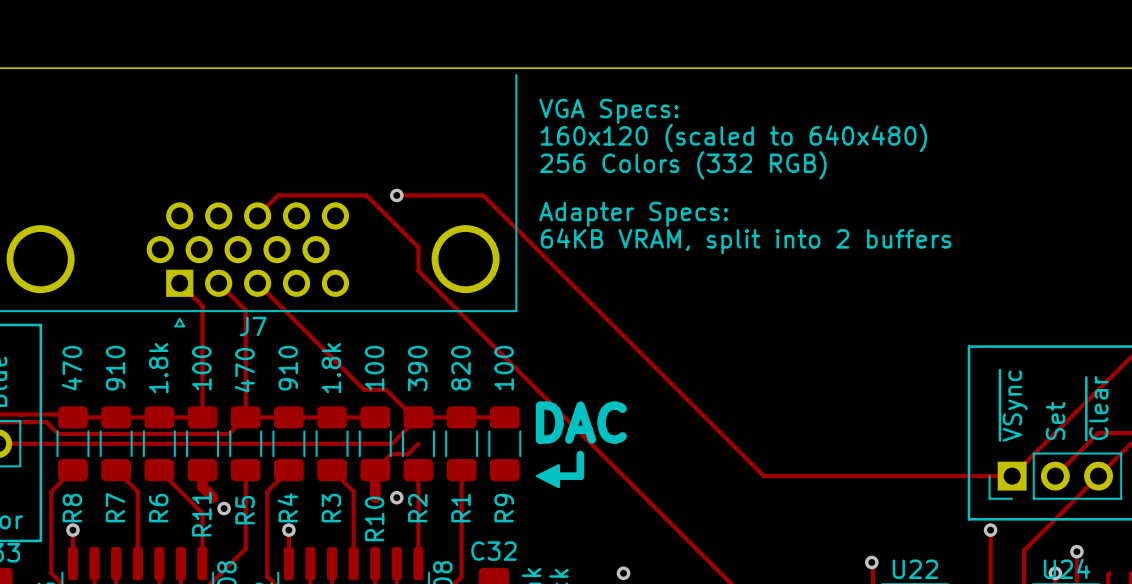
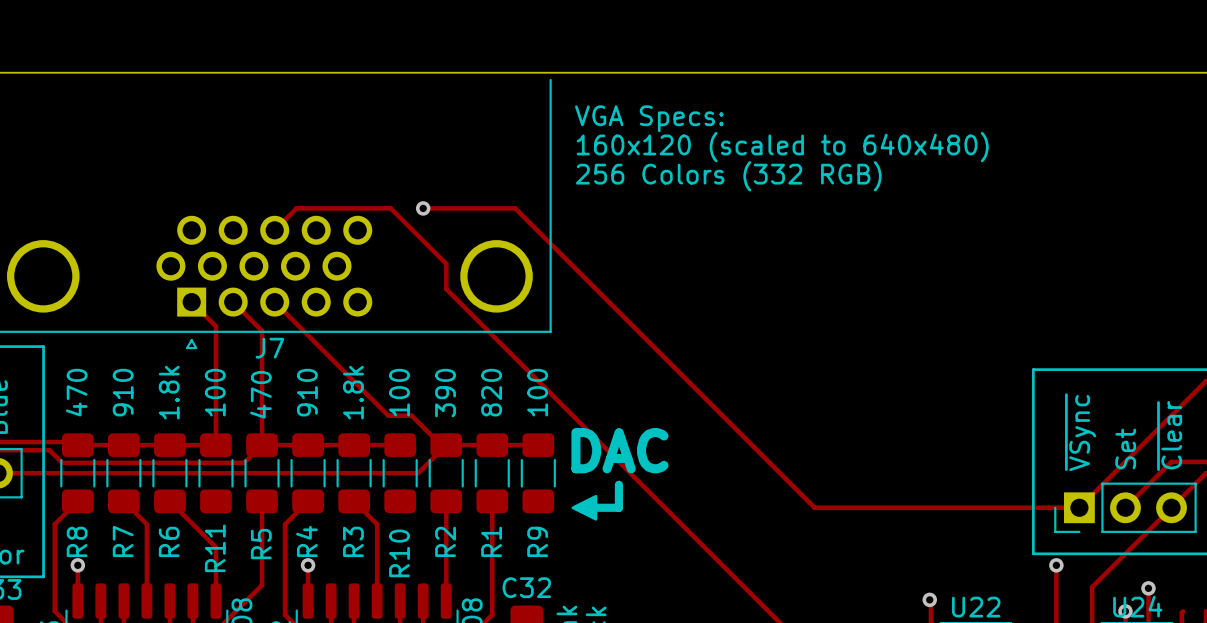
text: Adapter Specs: (633, 214) -> none
text: 64KB VRAM, split into 2 buffers (746, 241) -> none
track: (418, 443) (407, 454) (391, 454) (375, 470) (375, 497) -> none
track: (202, 470) (202, 486) (213, 497) -> none
via: (396, 497) -> none
via: (224, 508) -> none
via: (623, 573) -> none

